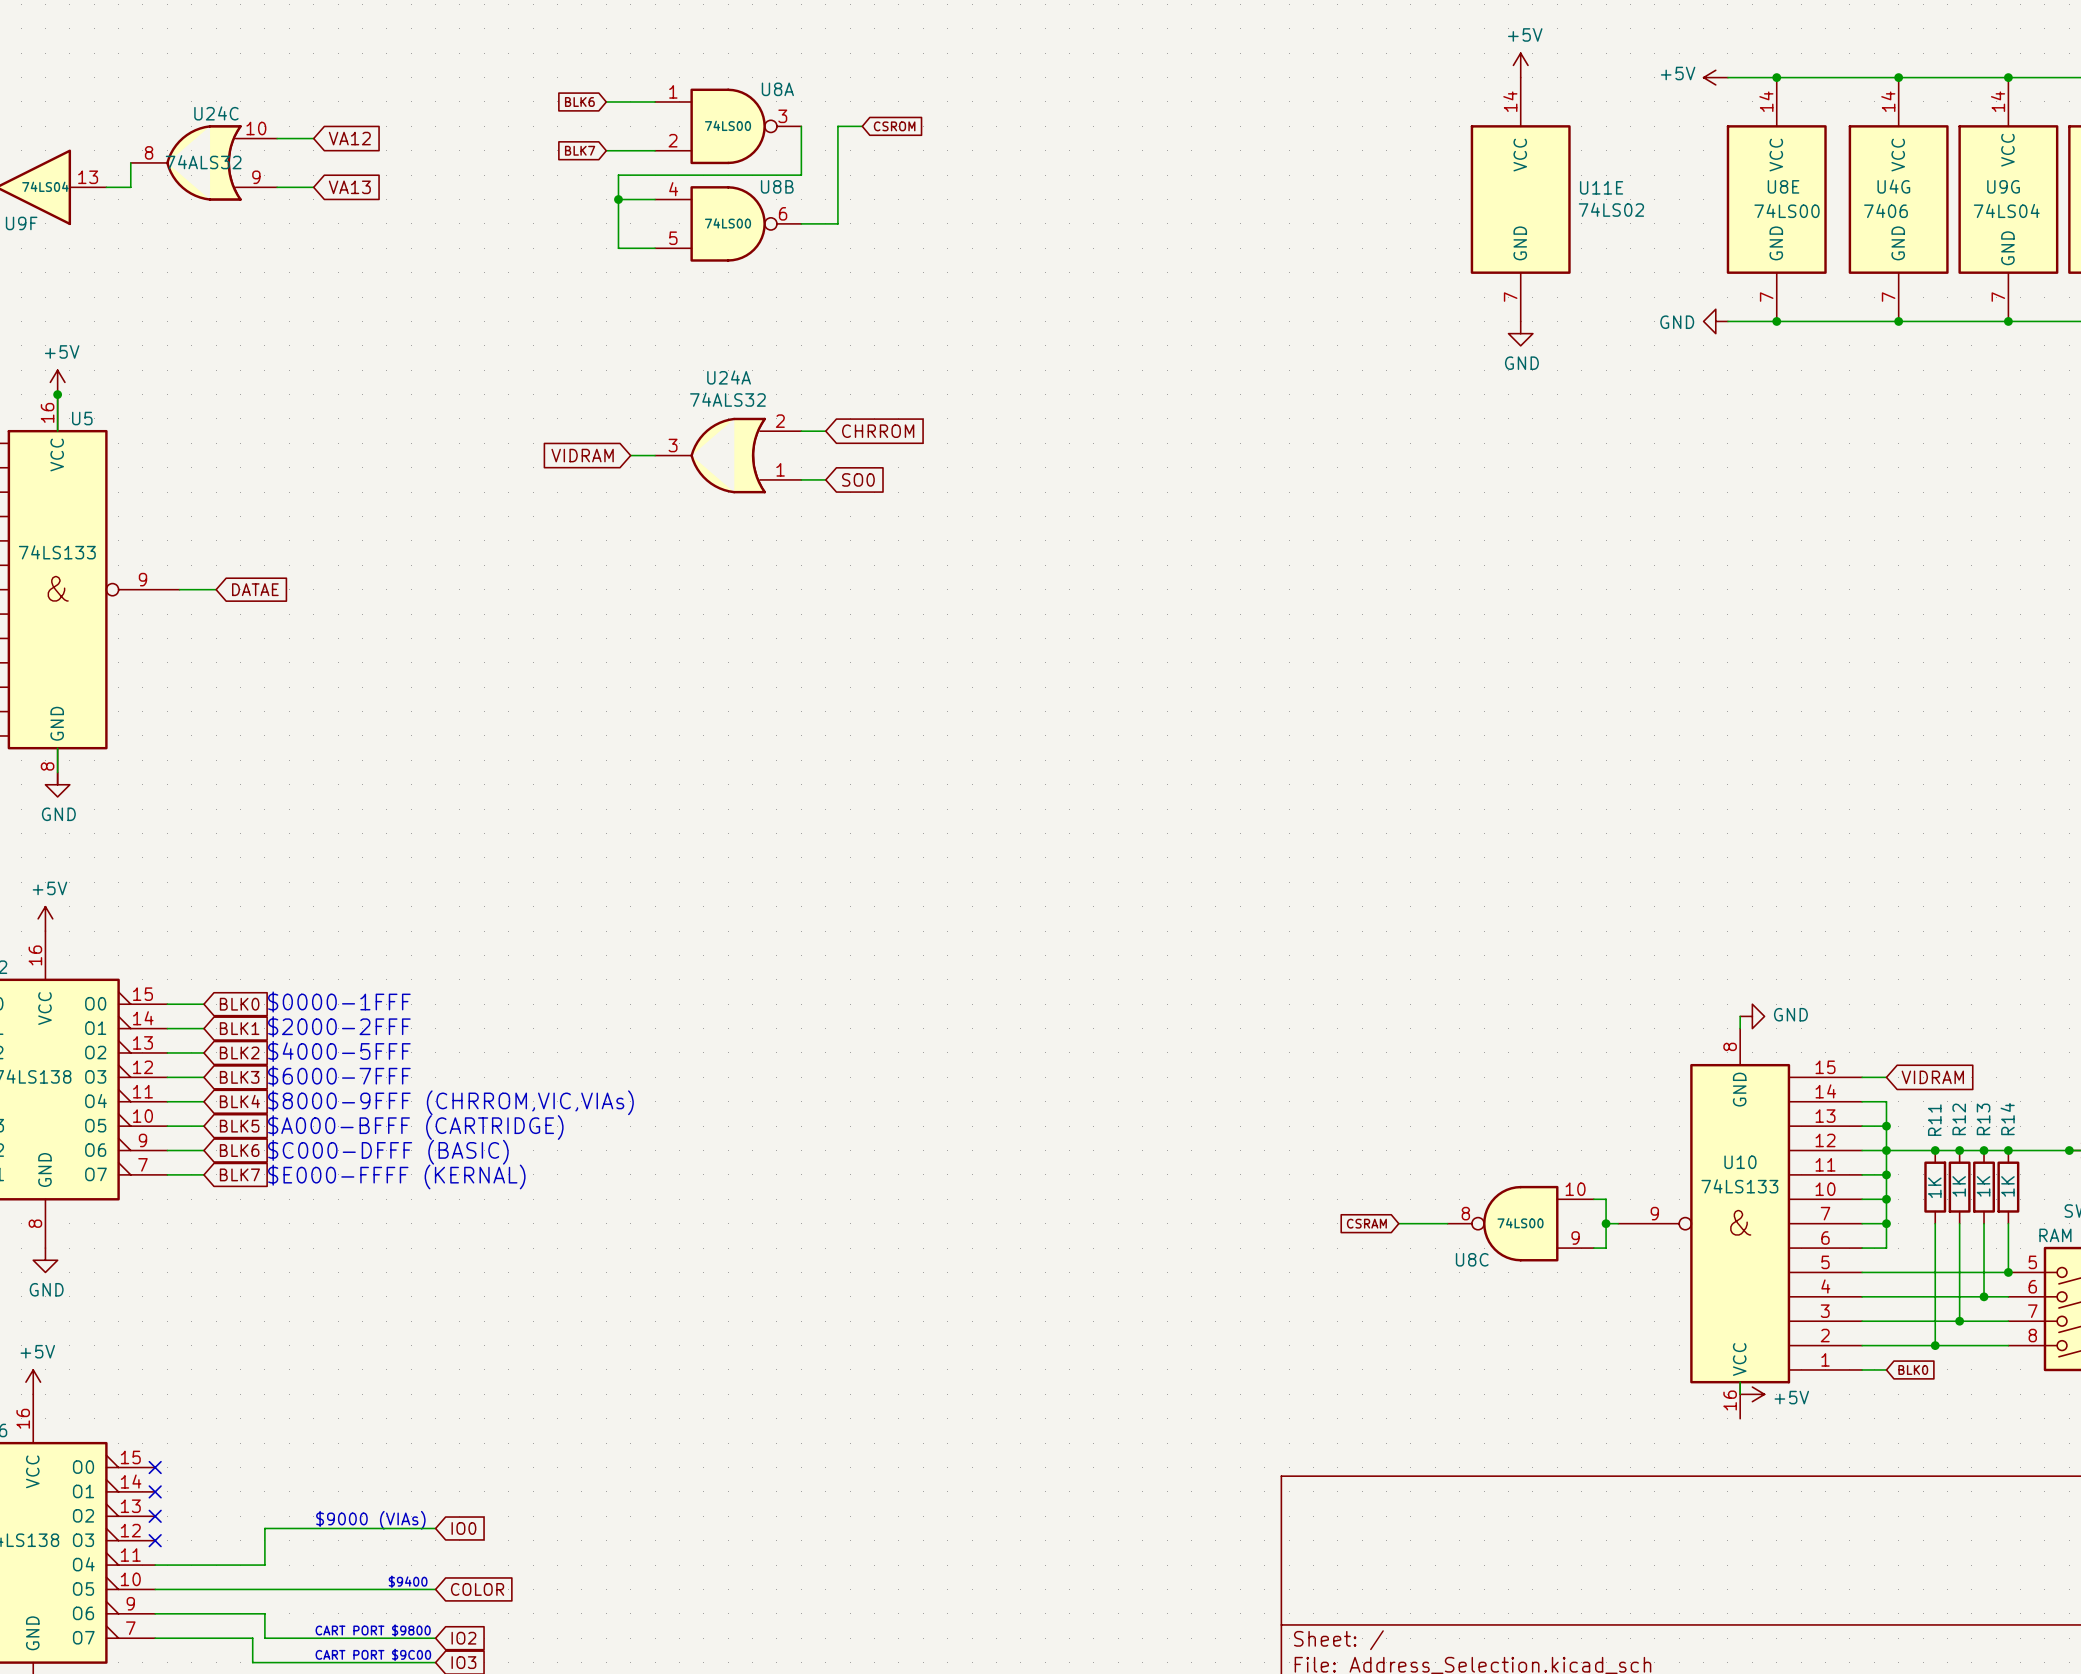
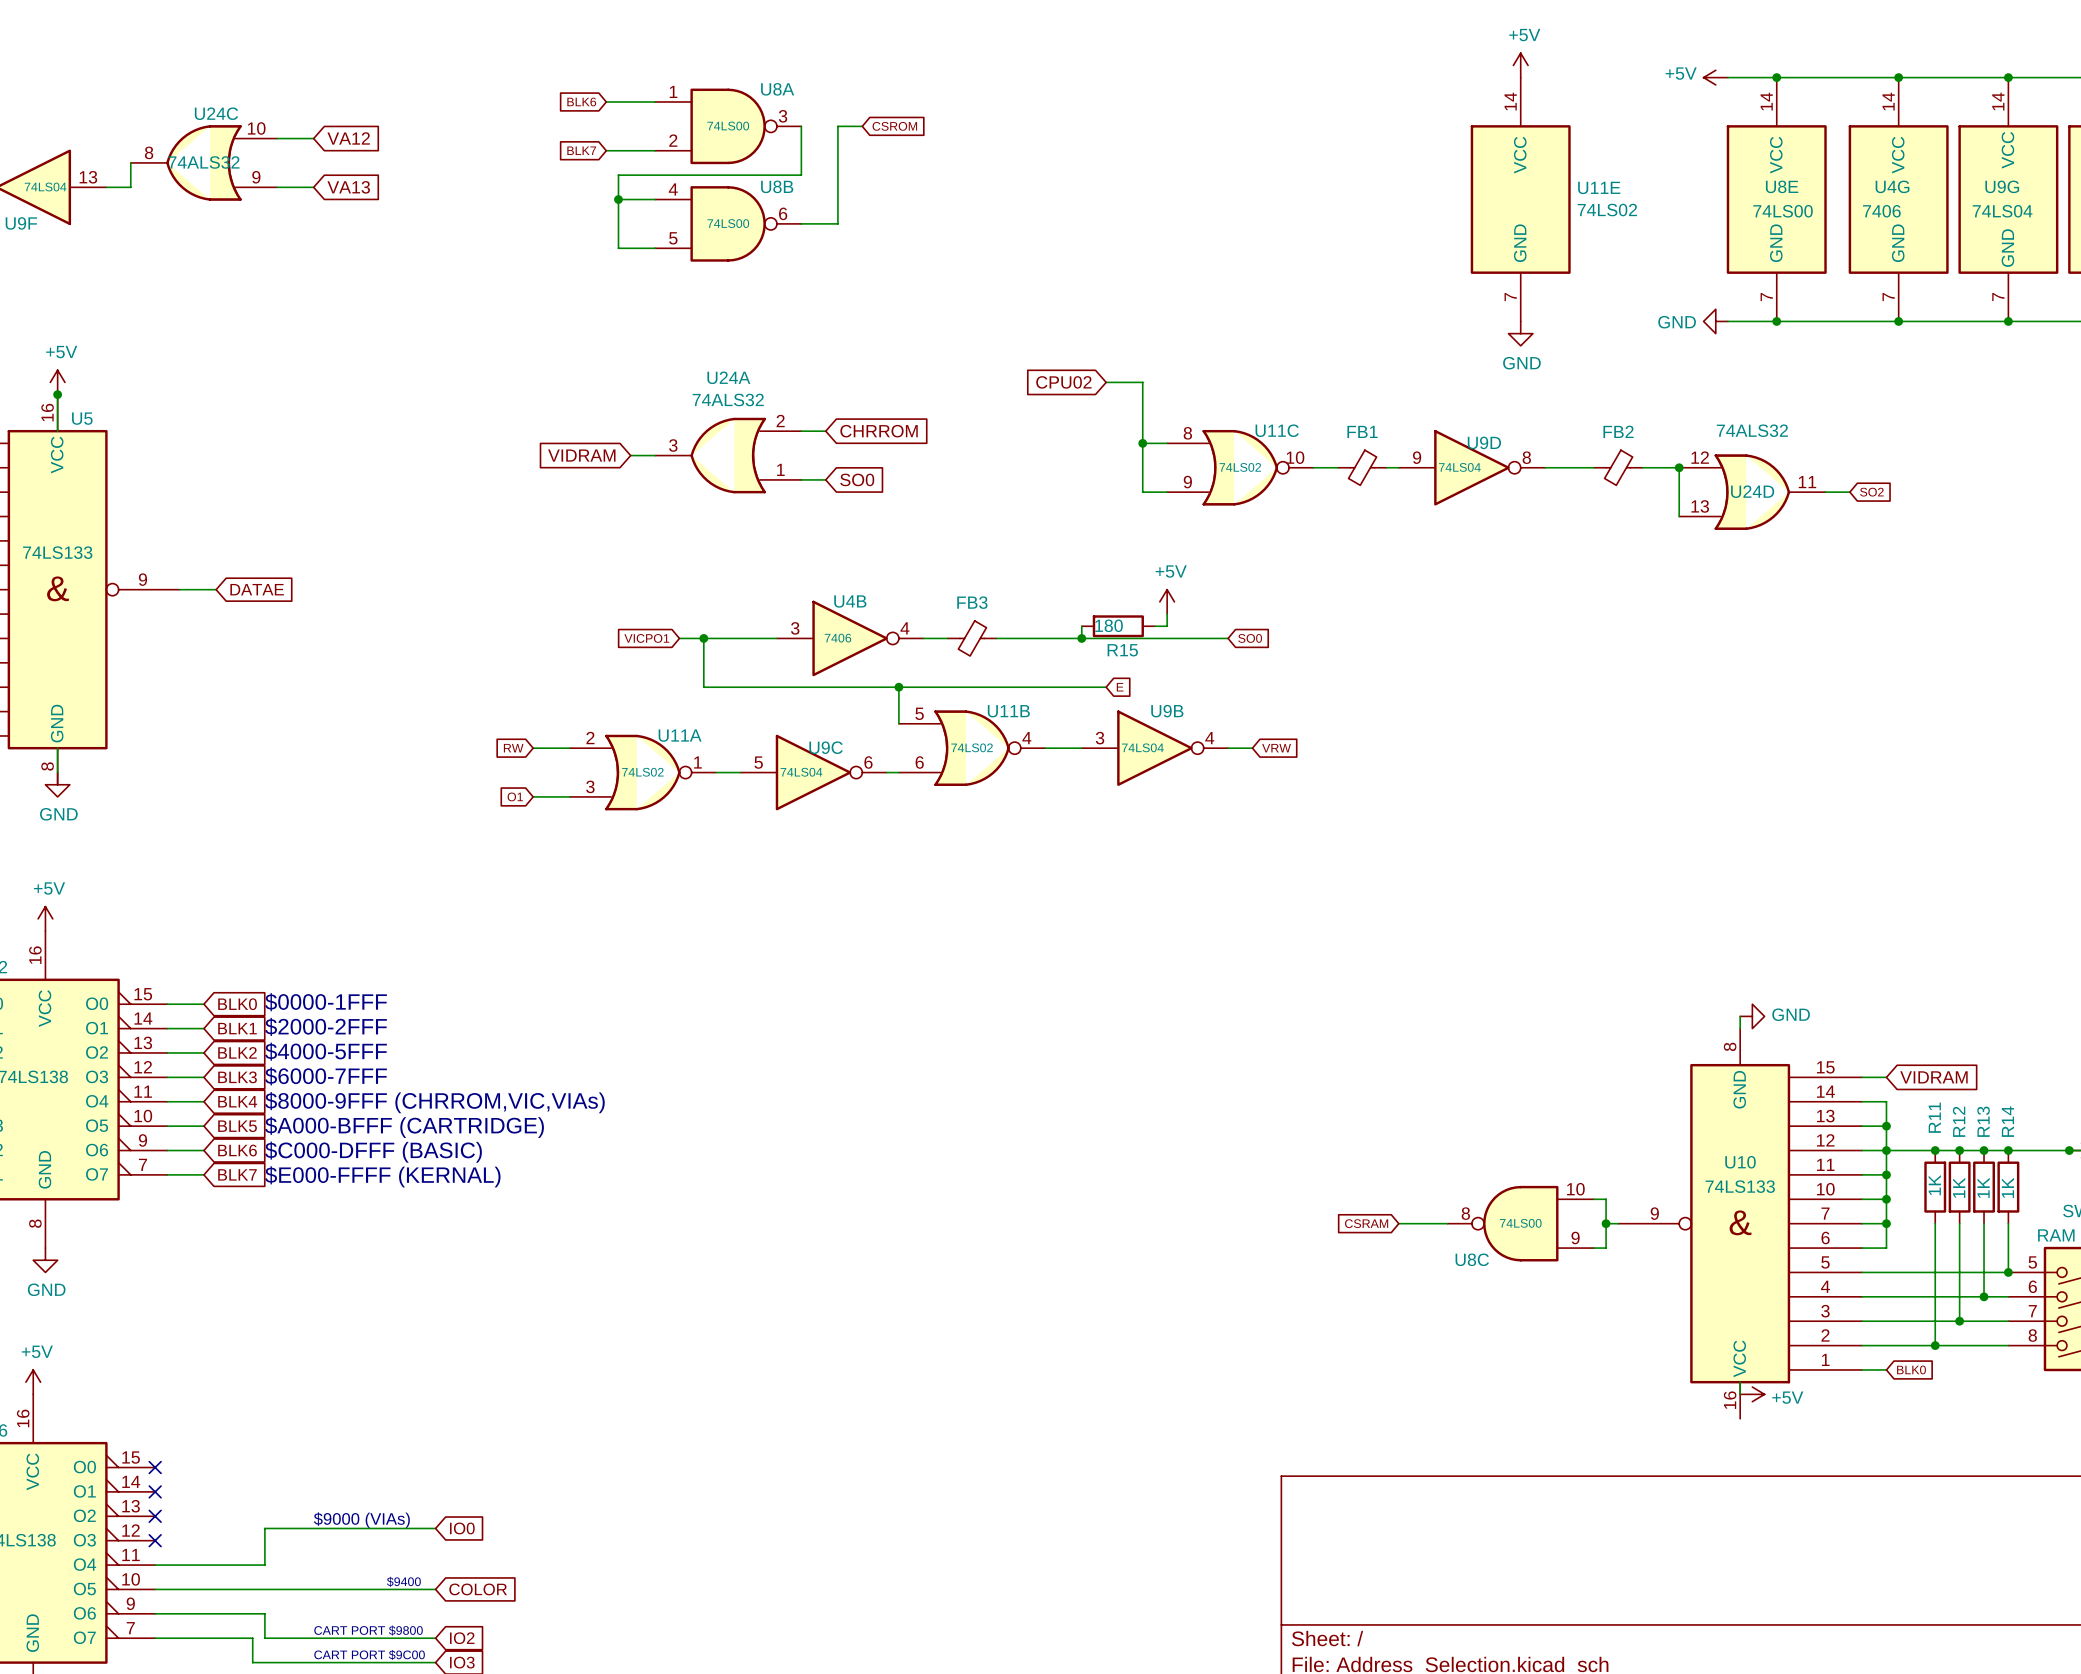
global label: none -> CPU02 (1063, 382)
wire: none -> (1106, 382) (1142, 382) (1142, 492) (1167, 492)
wire: none -> (1142, 443) (1167, 443)
junction: none -> (1142, 443)
U11C: none -> 74LS02 (1240, 467)
wire: none -> (1313, 467) (1337, 467)
FB1: none -> (1362, 467)
wire: none -> (1386, 467) (1398, 467)
U9D: none -> 74LS04 (1471, 467)
wire: none -> (1545, 467) (1593, 467)
FB2: none -> (1618, 467)
wire: none -> (1642, 467) (1679, 467) (1679, 516)
junction: none -> (1679, 467)
U24D: none -> 74ALS32 (1752, 492)
wire: none -> (1825, 492) (1849, 492)
global label: none -> SO2 (1871, 492)
power symbol: none -> +5V (1167, 601)
wire: none -> (1167, 614) (1167, 626) (1154, 626)
wire: none -> (1081, 626) (1081, 638)
R15: none -> 180 (1118, 626)
global label: none -> VICPO1 (646, 638)
wire: none -> (679, 638) (776, 638)
wire: none -> (703, 638) (703, 687) (1106, 687)
junction: none -> (703, 638)
U4B: none -> 7406 (850, 638)
wire: none -> (923, 638) (947, 638)
FB3: none -> (972, 638)
wire: none -> (996, 638) (1228, 638)
junction: none -> (1081, 638)
global label: none -> SO0 (1250, 638)
wire: none -> (898, 687) (898, 723)
junction: none -> (898, 687)
global label: none -> E (1120, 687)
global label: none -> RW (513, 748)
wire: none -> (533, 748) (569, 748)
U11B: none -> 74LS02 (972, 748)
wire: none -> (1045, 748) (1081, 748)
U9B: none -> 74LS04 (1154, 748)
wire: none -> (1228, 748) (1252, 748)
global label: none -> VRW (1276, 748)
U11A: none -> 74LS02 (642, 772)
wire: none -> (716, 772) (740, 772)
U9C: none -> 74LS04 (813, 772)
wire: none -> (886, 772) (898, 772)
global label: none -> O1 (515, 796)
wire: none -> (533, 796) (569, 796)

